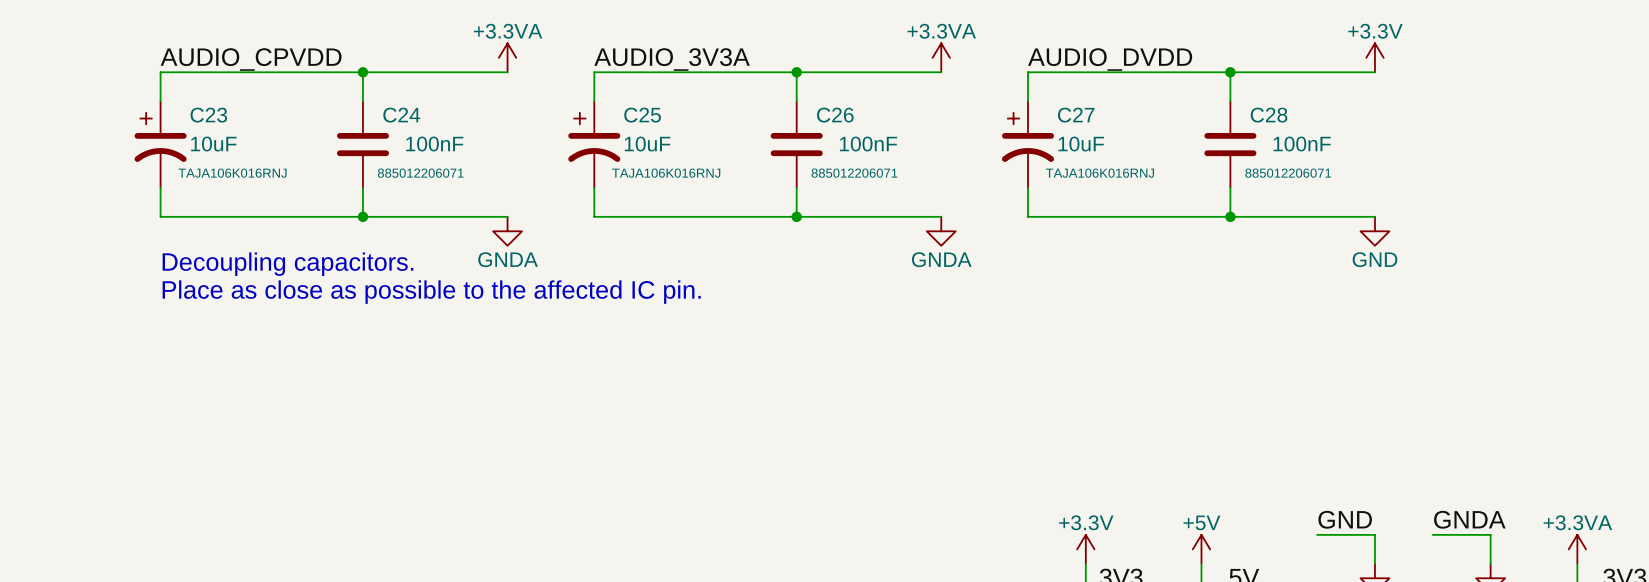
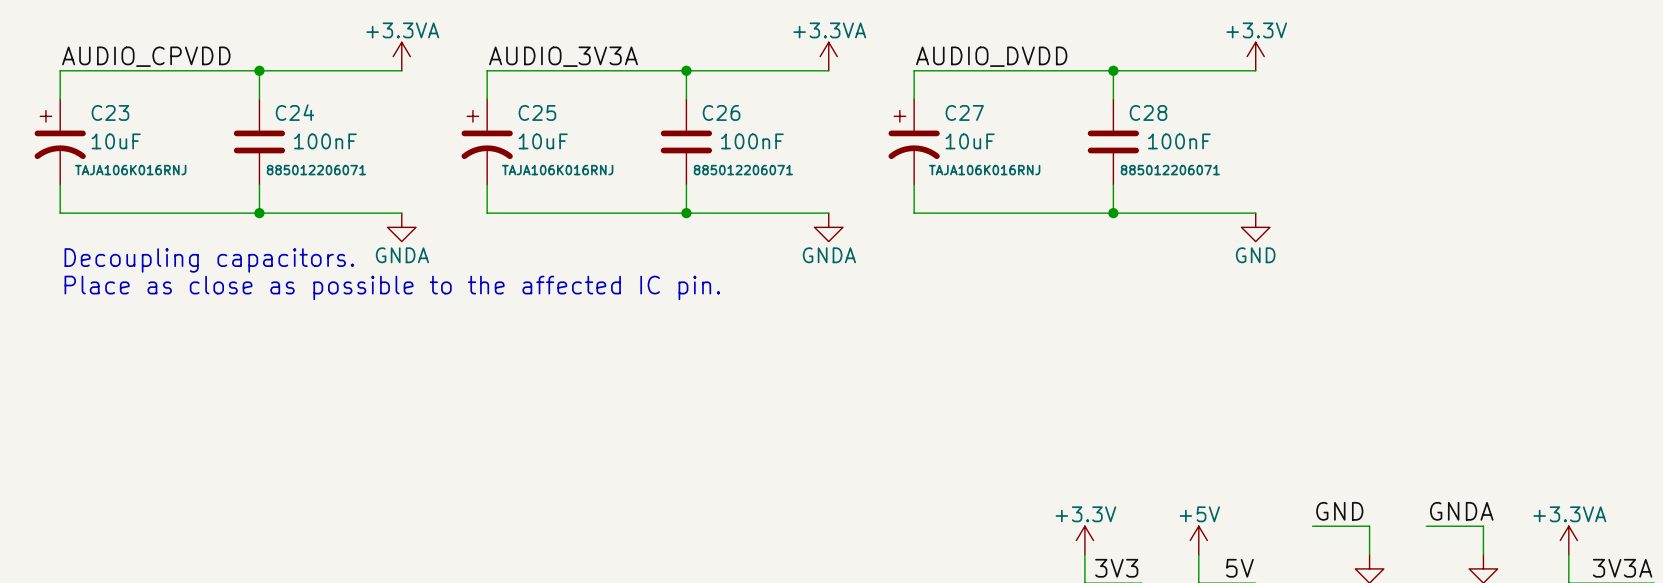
power symbol position: +3.3VA (507, 57) -> +3.3VA (401, 56)
power symbol position: +3.3VA (941, 57) -> +3.3VA (828, 56)
power symbol position: +3.3V (1374, 57) -> +3.3V (1255, 56)
label position: AUDIO_CPVDD (251, 59) -> AUDIO_CPVDD (146, 56)
label position: AUDIO_3V3A (672, 59) -> AUDIO_3V3A (563, 56)
label position: AUDIO_DVDD (1110, 59) -> AUDIO_DVDD (991, 56)
wire: (160, 72) (160, 101) -> (174, 70) (60, 70) (60, 99)
junction: none -> (259, 70)
wire: (362, 72) (362, 101) -> (259, 70) (259, 99)
junction: (362, 72) -> none
wire: (391, 72) (478, 72) -> (487, 99) (487, 70)
wire: (594, 72) (594, 101) -> (601, 70) (515, 70)
junction: none -> (686, 70)
wire: (796, 72) (796, 101) -> (686, 70) (686, 99)
junction: (796, 72) -> none
wire: (825, 72) (912, 72) -> (914, 99) (914, 70)
wire: (1028, 72) (1028, 101) -> (1027, 70) (942, 70)
junction: none -> (1113, 70)
wire: (1230, 72) (1230, 101) -> (1113, 70) (1113, 99)
junction: (1230, 72) -> none
wire: (1259, 72) (1374, 72) -> none
C23 position: (160, 144) -> (60, 141)
C24 position: (362, 144) -> (259, 141)
C25 position: (594, 144) -> (487, 141)
C26 position: (796, 144) -> (686, 141)
C27 position: (1028, 144) -> (914, 141)
C28 position: (1230, 144) -> (1113, 141)
wire: (160, 187) (160, 216) -> (60, 184) (60, 213) (174, 213)
wire: (362, 187) (362, 216) -> (259, 184) (259, 213)
wire: (594, 187) (594, 216) -> (515, 213) (601, 213)
wire: (796, 187) (796, 216) -> (686, 184) (686, 213)
wire: (1028, 187) (1028, 216) -> (942, 213) (1027, 213)
wire: (1230, 187) (1230, 216) -> (1113, 184) (1113, 213)
junction: none -> (259, 213)
junction: (362, 216) -> none
wire: (391, 216) (478, 216) -> (487, 184) (487, 213)
junction: none -> (686, 213)
junction: (796, 216) -> none
wire: (825, 216) (912, 216) -> (914, 184) (914, 213)
junction: none -> (1113, 213)
junction: (1230, 216) -> none
wire: (1259, 216) (1374, 216) -> none
power symbol position: GNDA (507, 231) -> GNDA (401, 227)
power symbol position: GNDA (941, 231) -> GNDA (828, 227)
power symbol position: GND (1374, 231) -> GND (1255, 227)
text position: Decoupling capacitors. (288, 264) -> Decoupling capacitors. (209, 260)
text position: Place as close as possible to the affected IC pin. (431, 292) -> Place as close as possible to the affected IC pin. (392, 287)

